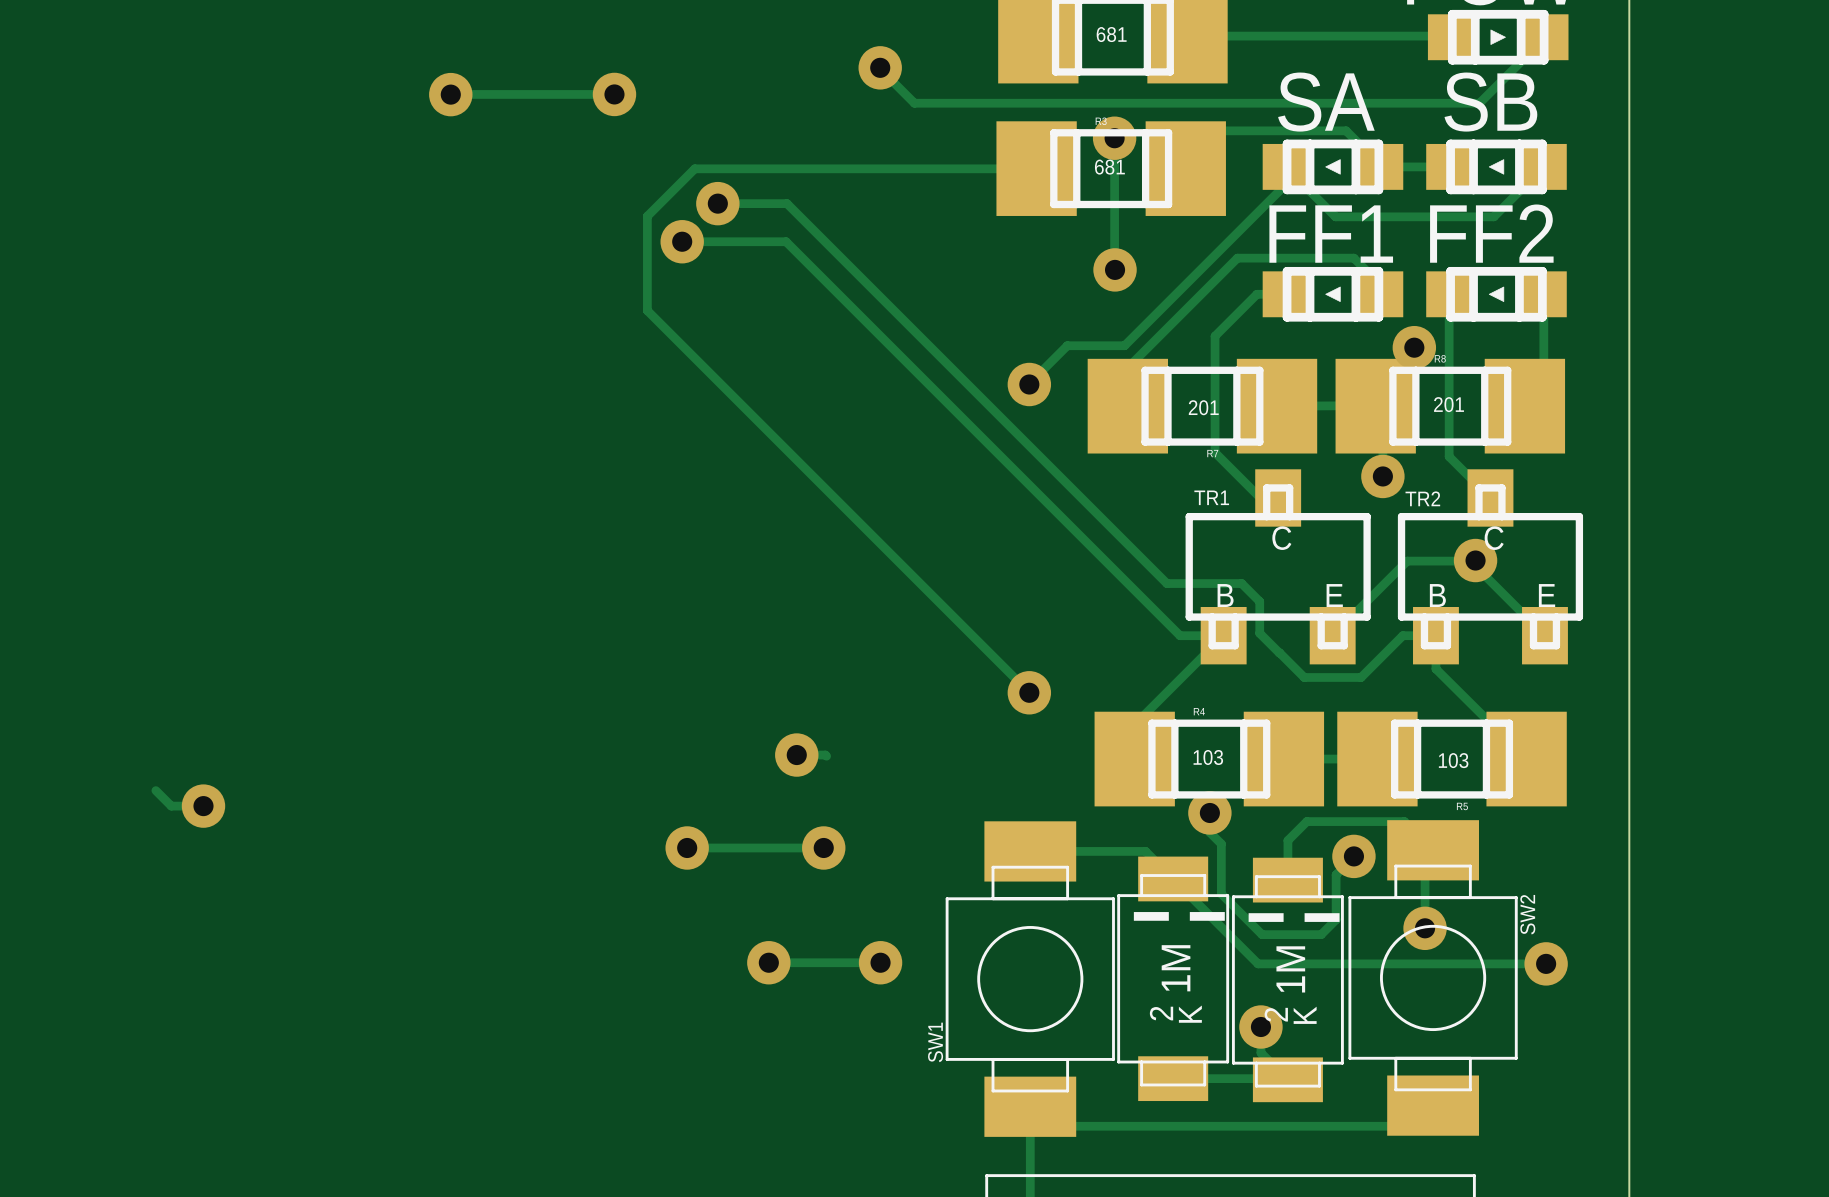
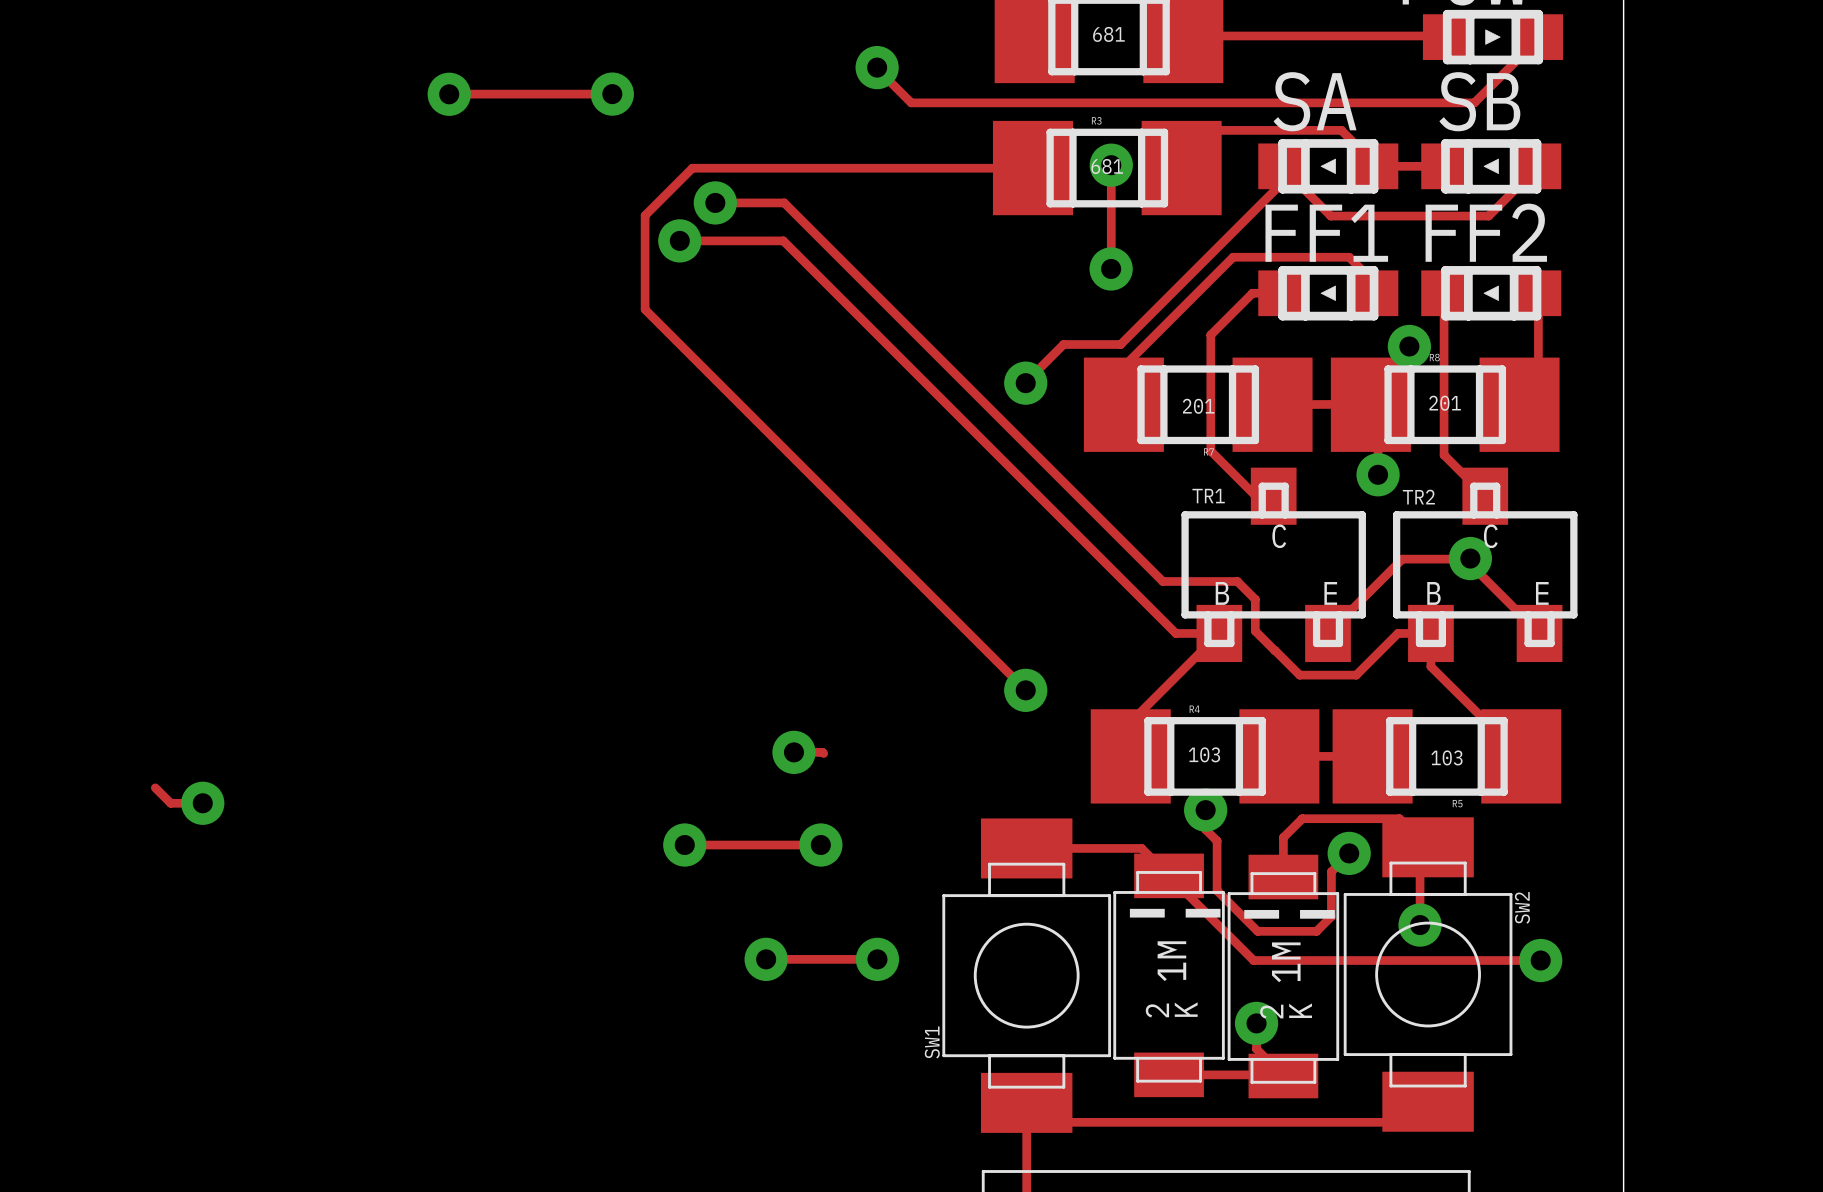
track: (1114, 138) (1114, 269) -> (1111, 165) (1111, 268)
via position: (1114, 138) -> (1111, 165)

